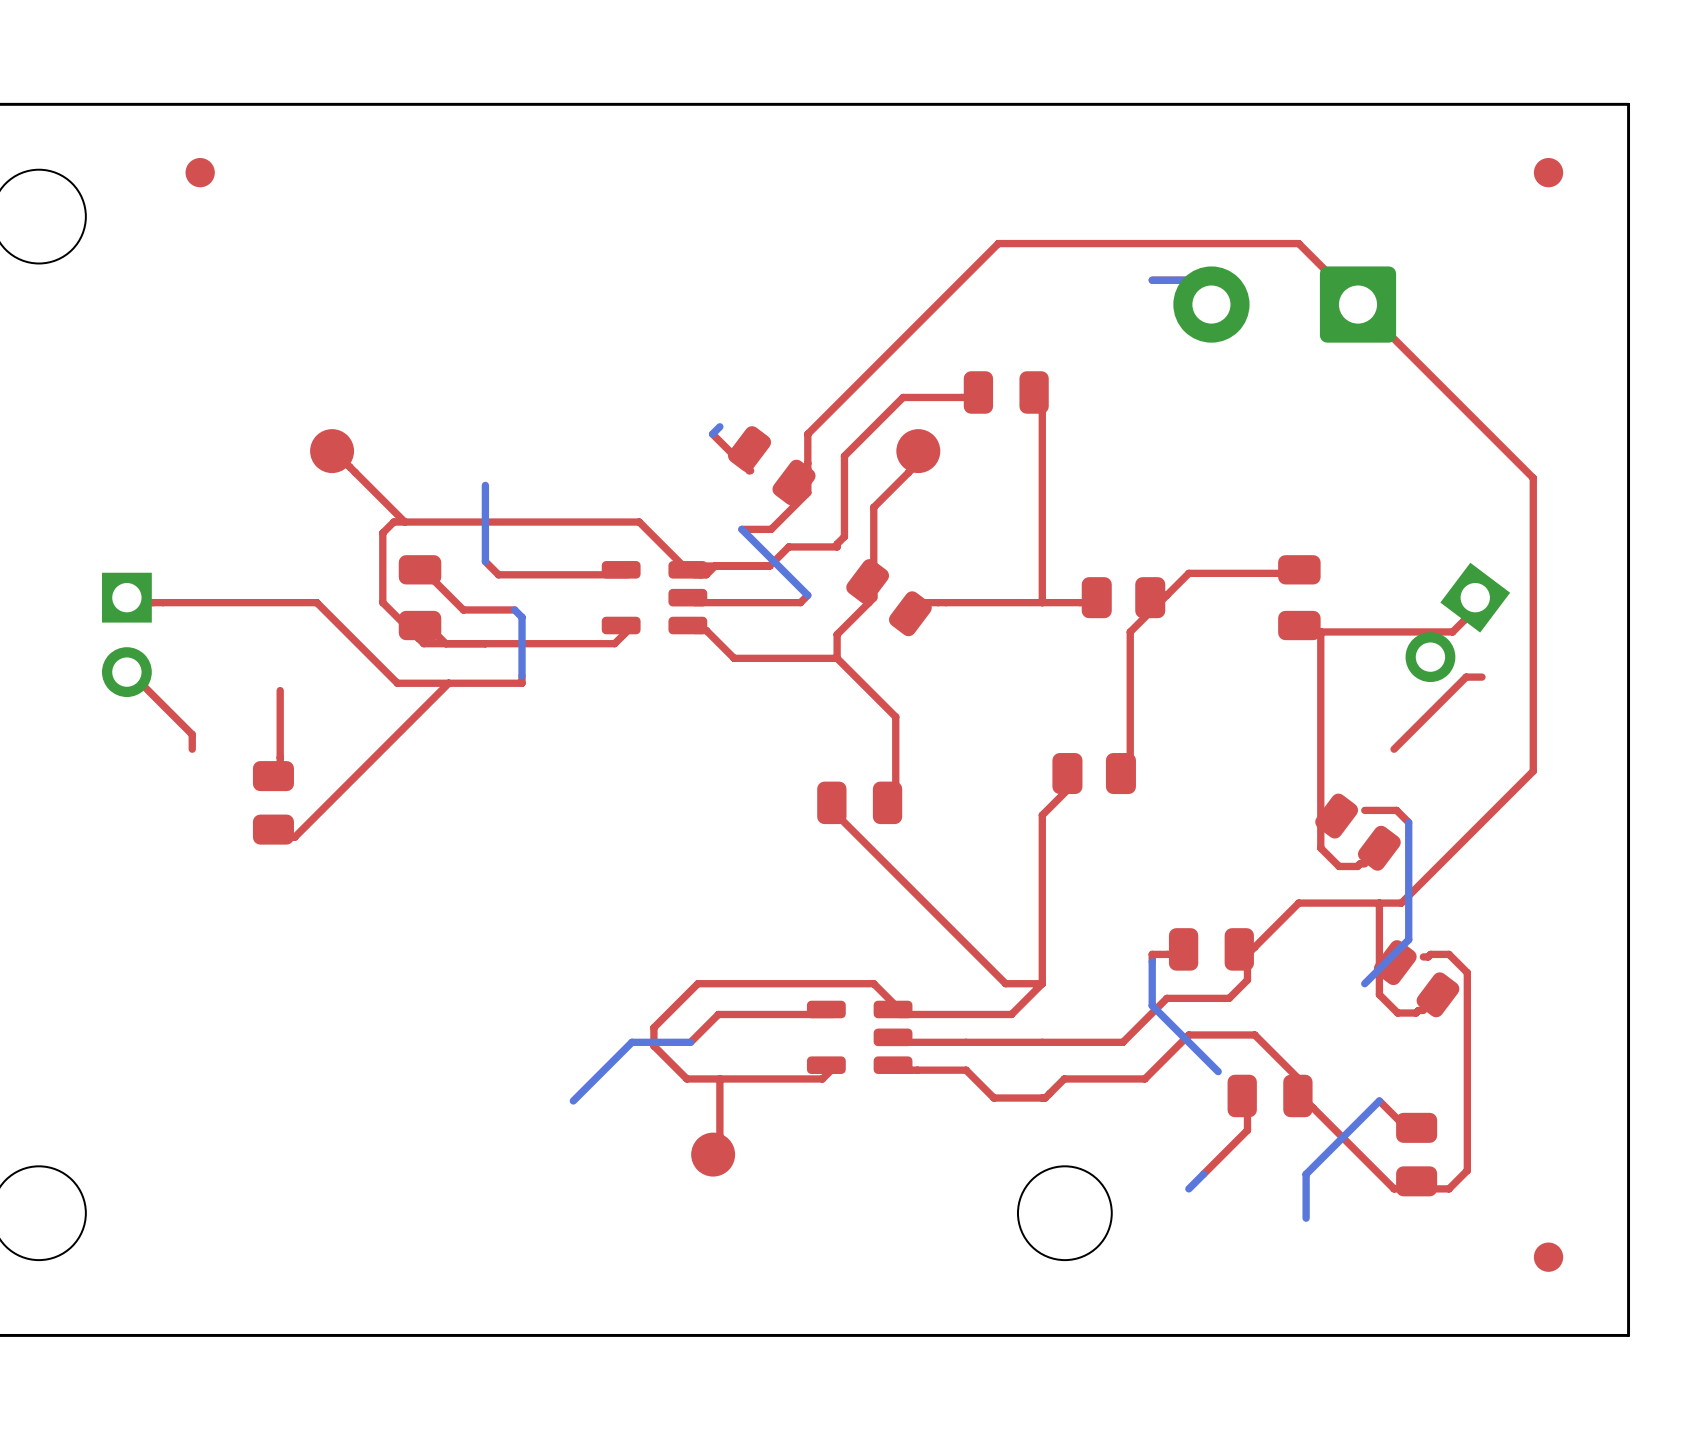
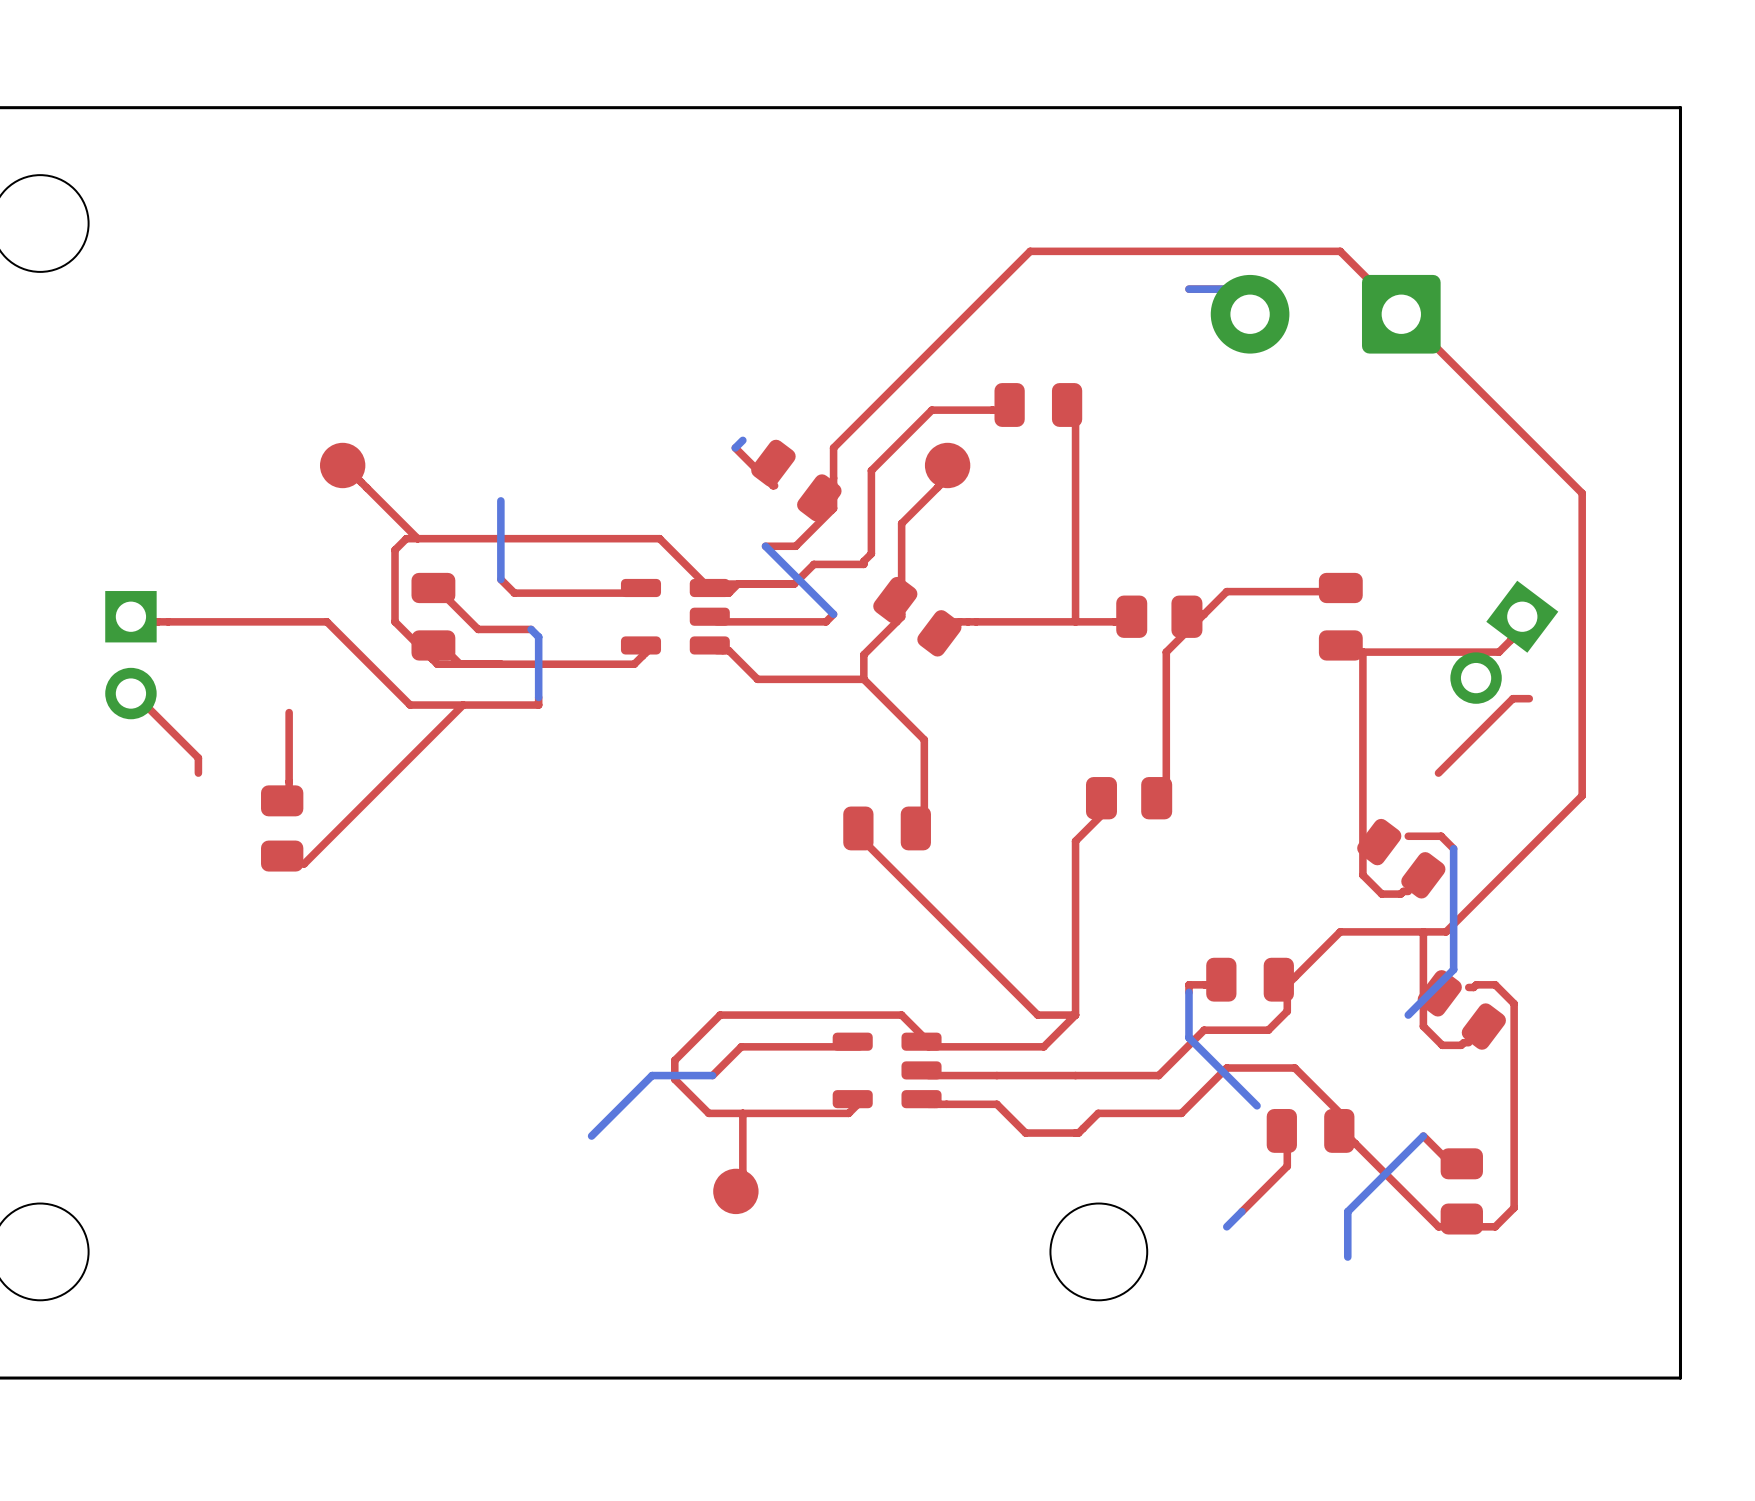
part: (200, 172) -> none
part: (1548, 172) -> none
part: (1548, 1257) -> none

